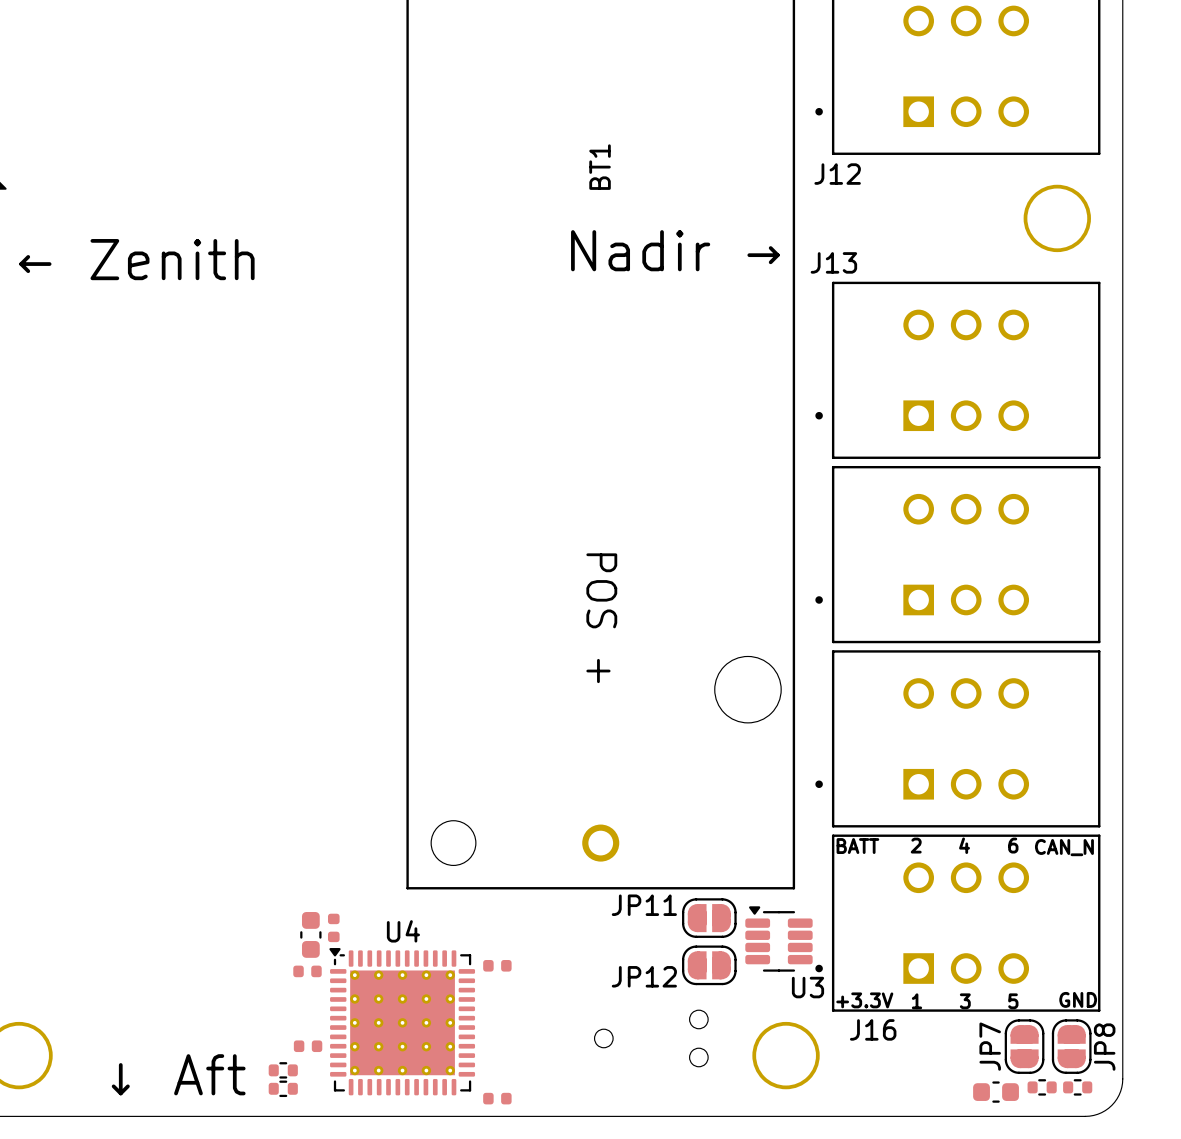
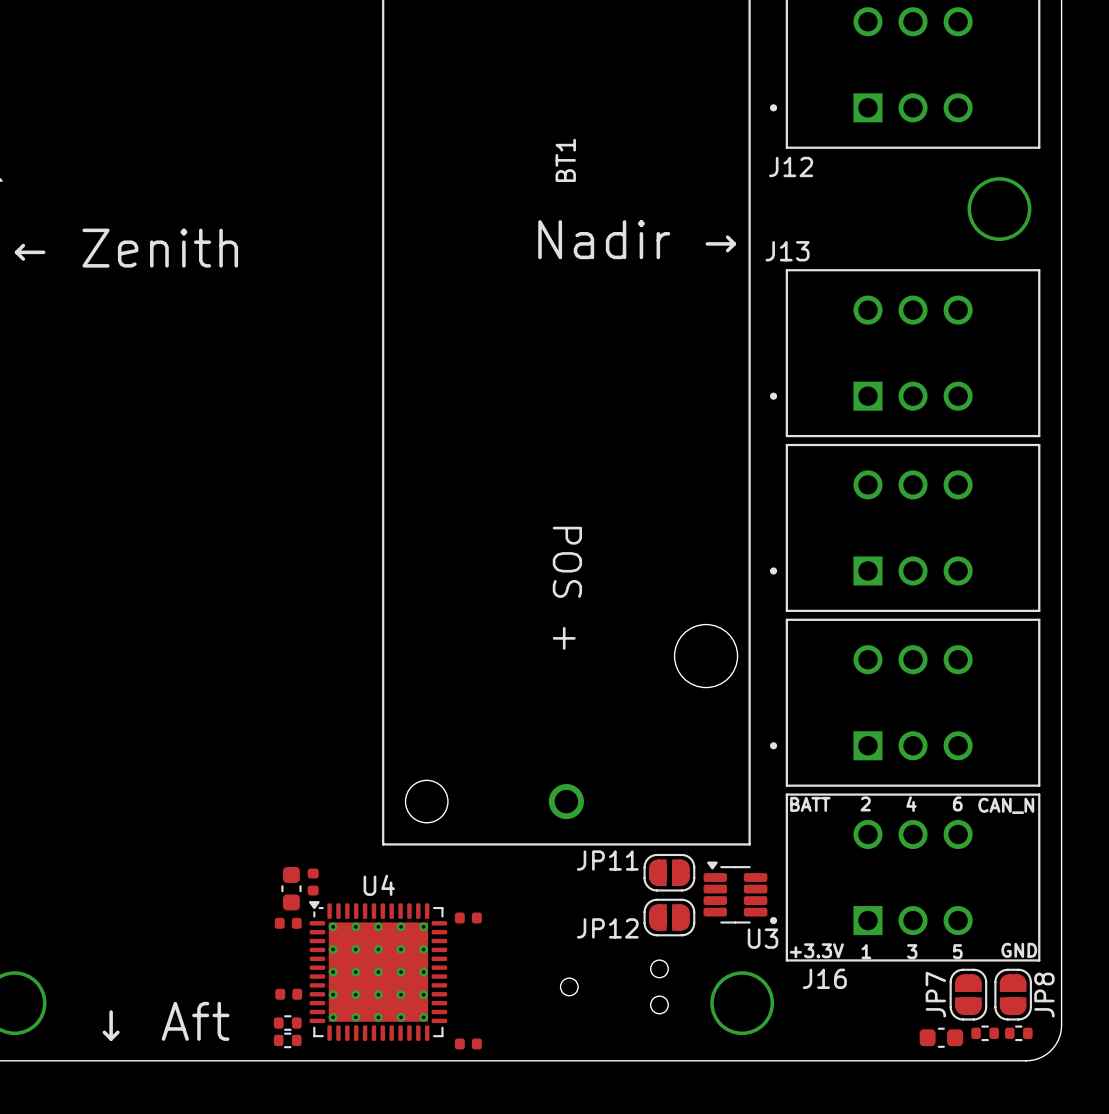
part: (283, 1070) -> none
part: none -> (287, 1023)
part: (283, 1088) -> none
part: none -> (287, 1040)

